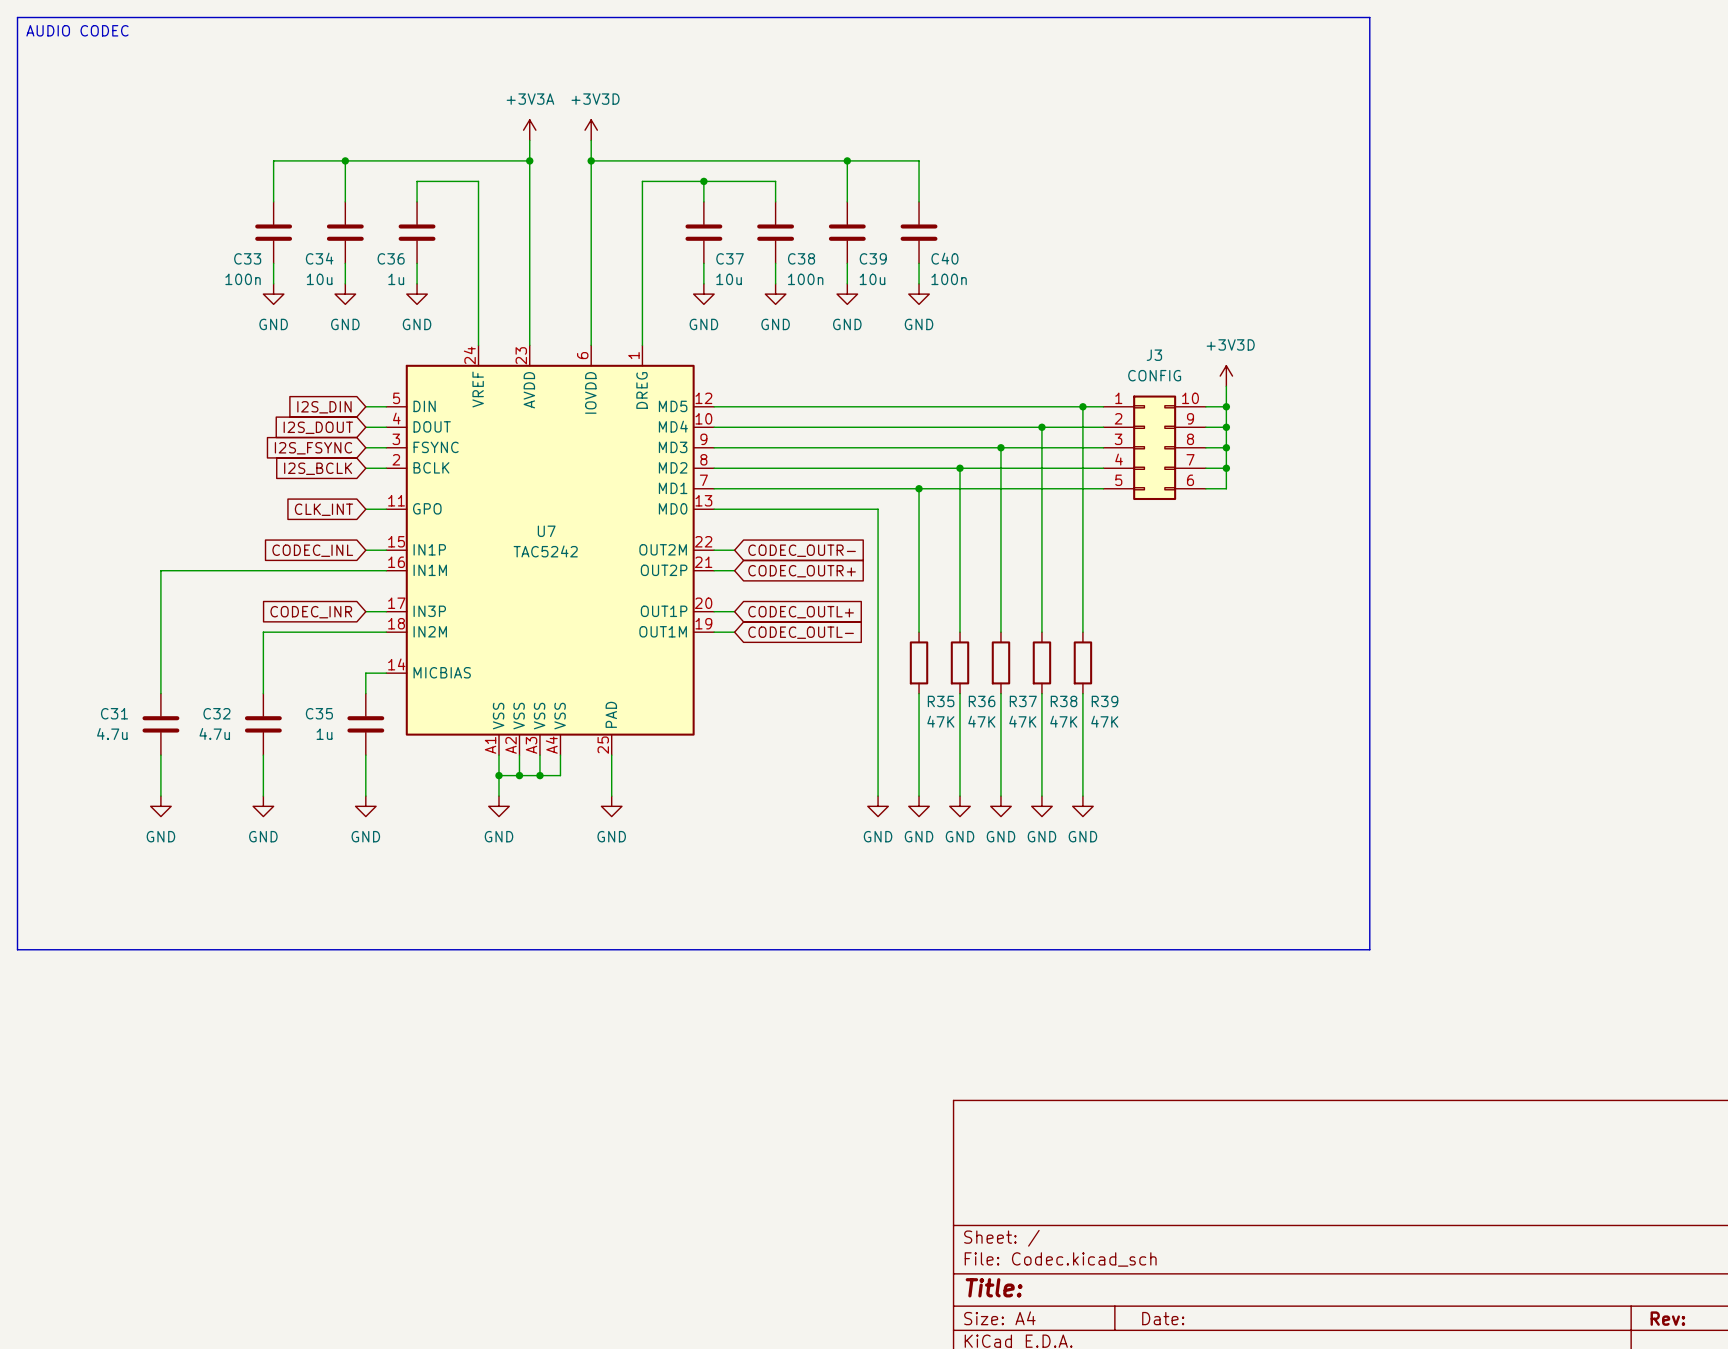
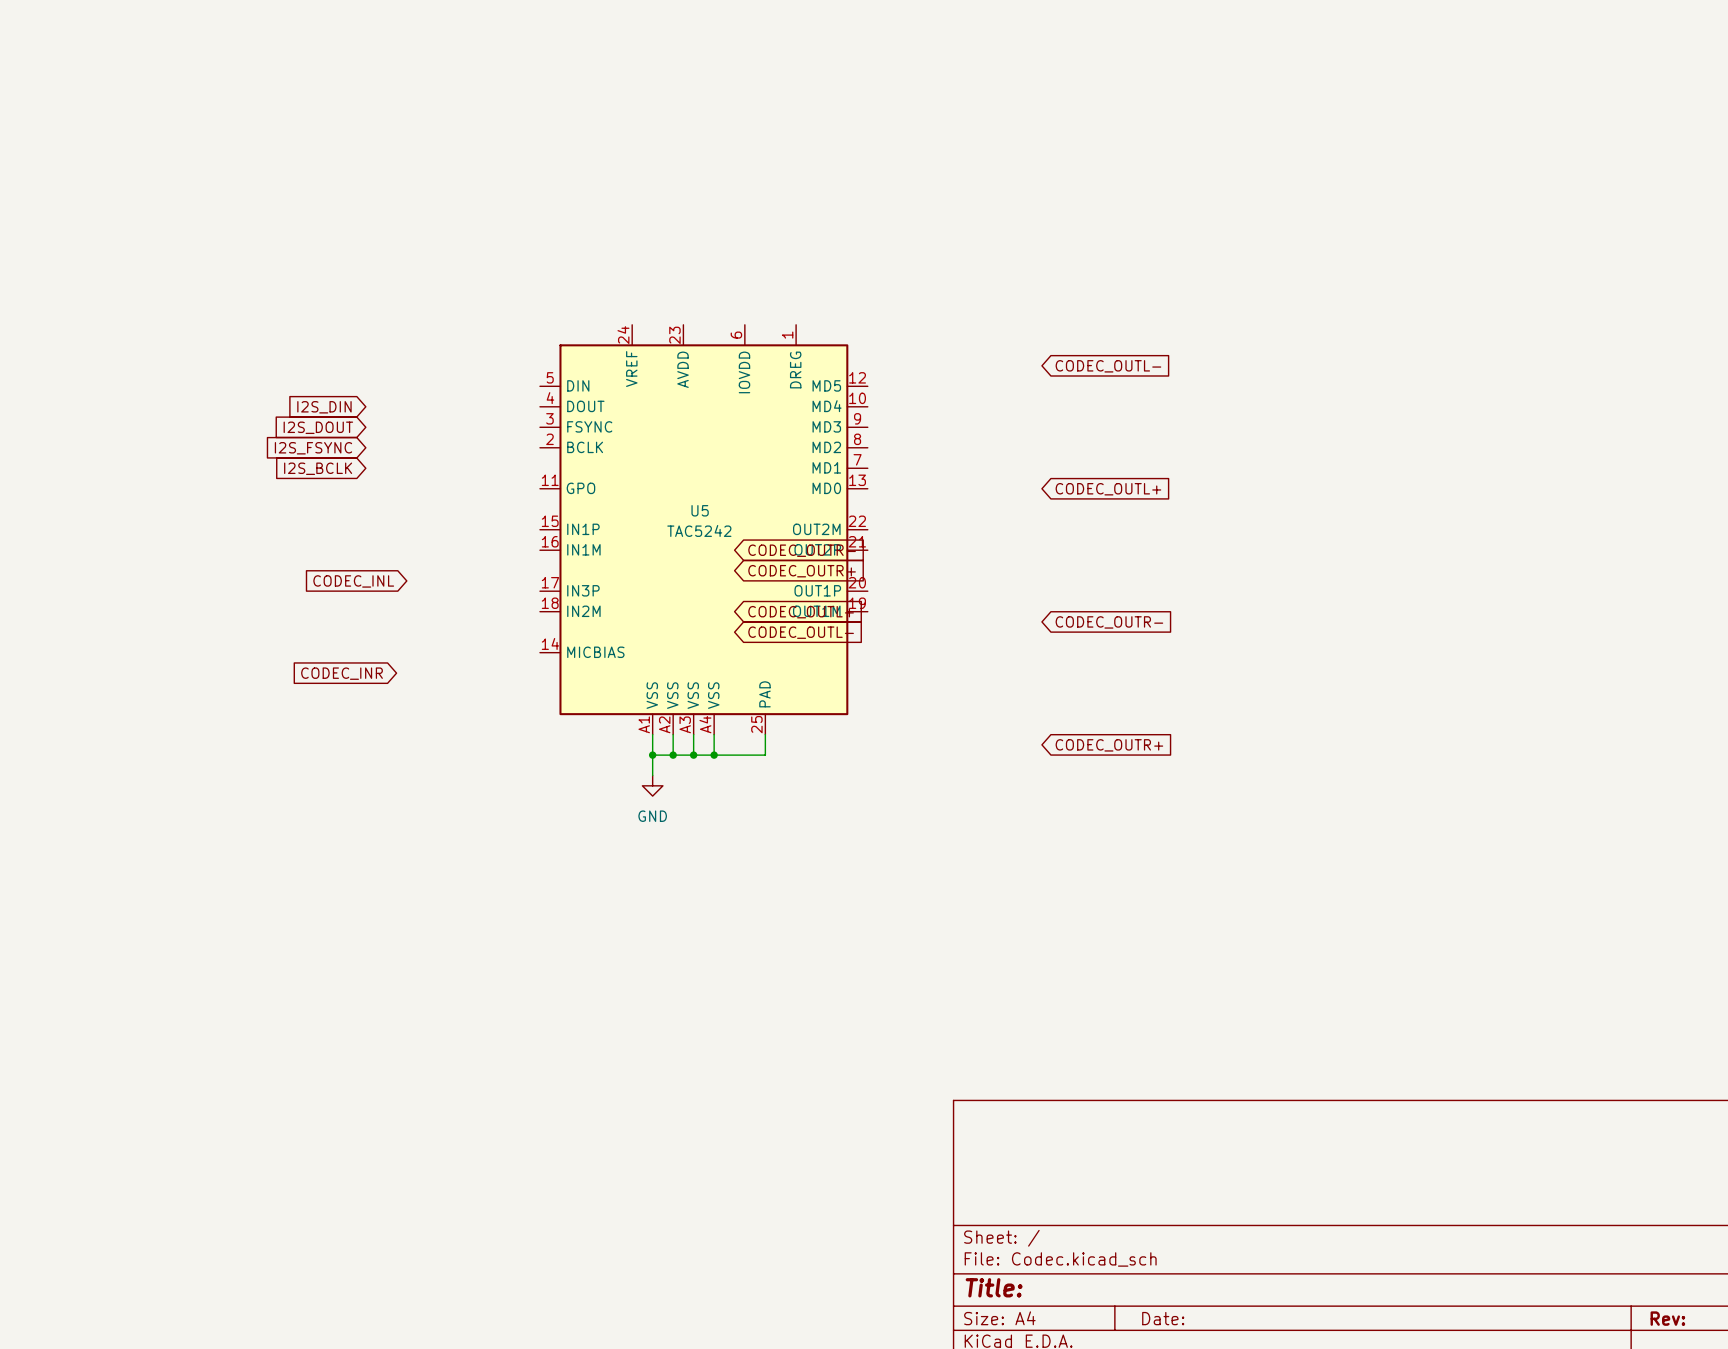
line: (17, 17) (1369, 17) (1369, 949) (17, 949) (17, 17) -> none
text: AUDIO CODEC (77, 30) -> none
power symbol: +3V3A (529, 130) -> none
power symbol: +3V3D (591, 130) -> none
wire: (529, 140) (529, 345) -> none
wire: (591, 140) (591, 345) -> none
wire: (345, 160) (345, 201) -> none
junction: (345, 160) -> none
wire: (529, 160) (273, 160) (273, 201) -> none
junction: (529, 160) -> none
wire: (591, 160) (919, 160) (919, 201) -> none
junction: (591, 160) -> none
wire: (847, 160) (847, 201) -> none
junction: (847, 160) -> none
wire: (703, 181) (703, 201) -> none
junction: (703, 181) -> none
wire: (417, 201) (417, 181) (478, 181) (478, 345) -> none
wire: (775, 201) (775, 181) (642, 181) (642, 345) -> none
C33: 100n (273, 232) -> none
C34: 10u (345, 232) -> none
C36: 1u (417, 232) -> none
C37: 10u (703, 232) -> none
C38: 100n (775, 232) -> none
C39: 10u (847, 232) -> none
C40: 100n (919, 232) -> none
wire: (273, 263) (273, 283) -> none
wire: (345, 263) (345, 283) -> none
wire: (417, 263) (417, 283) -> none
wire: (703, 263) (703, 283) -> none
wire: (775, 263) (775, 283) -> none
wire: (847, 263) (847, 283) -> none
wire: (919, 263) (919, 283) -> none
power symbol: GND (273, 294) -> none
power symbol: GND (345, 294) -> none
power symbol: GND (417, 294) -> none
power symbol: GND (703, 294) -> none
power symbol: GND (775, 294) -> none
power symbol: GND (847, 294) -> none
power symbol: GND (919, 294) -> none
global label: none -> CODEC_OUTL- (1108, 366)
power symbol: +3V3D (1226, 376) -> none
wire: (1226, 386) (1226, 488) (1205, 488) -> none
wire: (365, 406) (386, 406) -> none
wire: (714, 406) (1103, 406) -> none
wire: (1082, 406) (1082, 632) -> none
junction: (1082, 406) -> none
wire: (1205, 406) (1226, 406) -> none
junction: (1226, 406) -> none
wire: (365, 427) (386, 427) -> none
wire: (714, 427) (1103, 427) -> none
wire: (1041, 427) (1041, 632) -> none
junction: (1041, 427) -> none
wire: (1205, 427) (1226, 427) -> none
junction: (1226, 427) -> none
wire: (365, 447) (386, 447) -> none
wire: (714, 447) (1103, 447) -> none
wire: (1000, 447) (1000, 632) -> none
junction: (1000, 447) -> none
J3: CONFIG (1154, 447) -> none
wire: (1205, 447) (1226, 447) -> none
junction: (1226, 447) -> none
wire: (365, 468) (386, 468) -> none
wire: (714, 468) (1103, 468) -> none
wire: (960, 468) (960, 632) -> none
junction: (960, 468) -> none
wire: (1205, 468) (1226, 468) -> none
junction: (1226, 468) -> none
wire: (714, 488) (1103, 488) -> none
wire: (919, 488) (919, 632) -> none
junction: (919, 488) -> none
global label: none -> CODEC_OUTL+ (1108, 489)
global label: CLK_INT (323, 509) -> none
wire: (365, 509) (386, 509) -> none
wire: (714, 509) (878, 509) (878, 796) -> none
U5: none -> TAC5242 (703, 529)
global label position: CODEC_INL (312, 550) -> CODEC_INL (353, 581)
wire: (365, 550) (386, 550) -> none
U7: TAC5242 (550, 550) -> none
wire: (386, 570) (160, 570) (160, 693) -> none
wire: (365, 611) (386, 611) -> none
global label position: CODEC_INR (311, 612) -> CODEC_INR (342, 673)
global label: none -> CODEC_OUTR- (1109, 622)
wire: (386, 632) (263, 632) (263, 693) -> none
R35: 47K (919, 662) -> none
R36: 47K (960, 662) -> none
R37: 47K (1000, 662) -> none
R38: 47K (1041, 662) -> none
R39: 47K (1082, 662) -> none
wire: (386, 673) (365, 673) (365, 693) -> none
wire: (919, 693) (919, 796) -> none
wire: (960, 693) (960, 796) -> none
wire: (1000, 693) (1000, 796) -> none
wire: (1041, 693) (1041, 796) -> none
wire: (1082, 693) (1082, 796) -> none
C31: 4.7u (160, 724) -> none
C32: 4.7u (263, 724) -> none
C35: 1u (365, 724) -> none
wire: none -> (714, 734) (714, 755)
wire: none -> (765, 734) (765, 755) (652, 755)
global label: none -> CODEC_OUTR+ (1109, 745)
wire: (160, 755) (160, 796) -> none
wire: (263, 755) (263, 796) -> none
wire: (365, 755) (365, 796) -> none
wire: (498, 755) (498, 796) -> (652, 734) (652, 775)
wire: (519, 755) (519, 775) -> (673, 734) (673, 755)
wire: (539, 755) (539, 775) -> (693, 734) (693, 755)
wire: (560, 755) (560, 775) (498, 775) -> none
wire: (611, 755) (611, 796) -> none
junction: none -> (652, 755)
junction: none -> (673, 755)
junction: none -> (693, 755)
junction: none -> (714, 755)
junction: (498, 775) -> none
junction: (519, 775) -> none
junction: (539, 775) -> none
power symbol: GND (160, 806) -> none
power symbol: GND (263, 806) -> none
power symbol: GND (365, 806) -> none
power symbol: GND (498, 806) -> none
power symbol position: GND (611, 806) -> GND (652, 785)
power symbol: GND (878, 806) -> none
power symbol: GND (919, 806) -> none
power symbol: GND (960, 806) -> none
power symbol: GND (1000, 806) -> none
power symbol: GND (1041, 806) -> none
power symbol: GND (1082, 806) -> none

